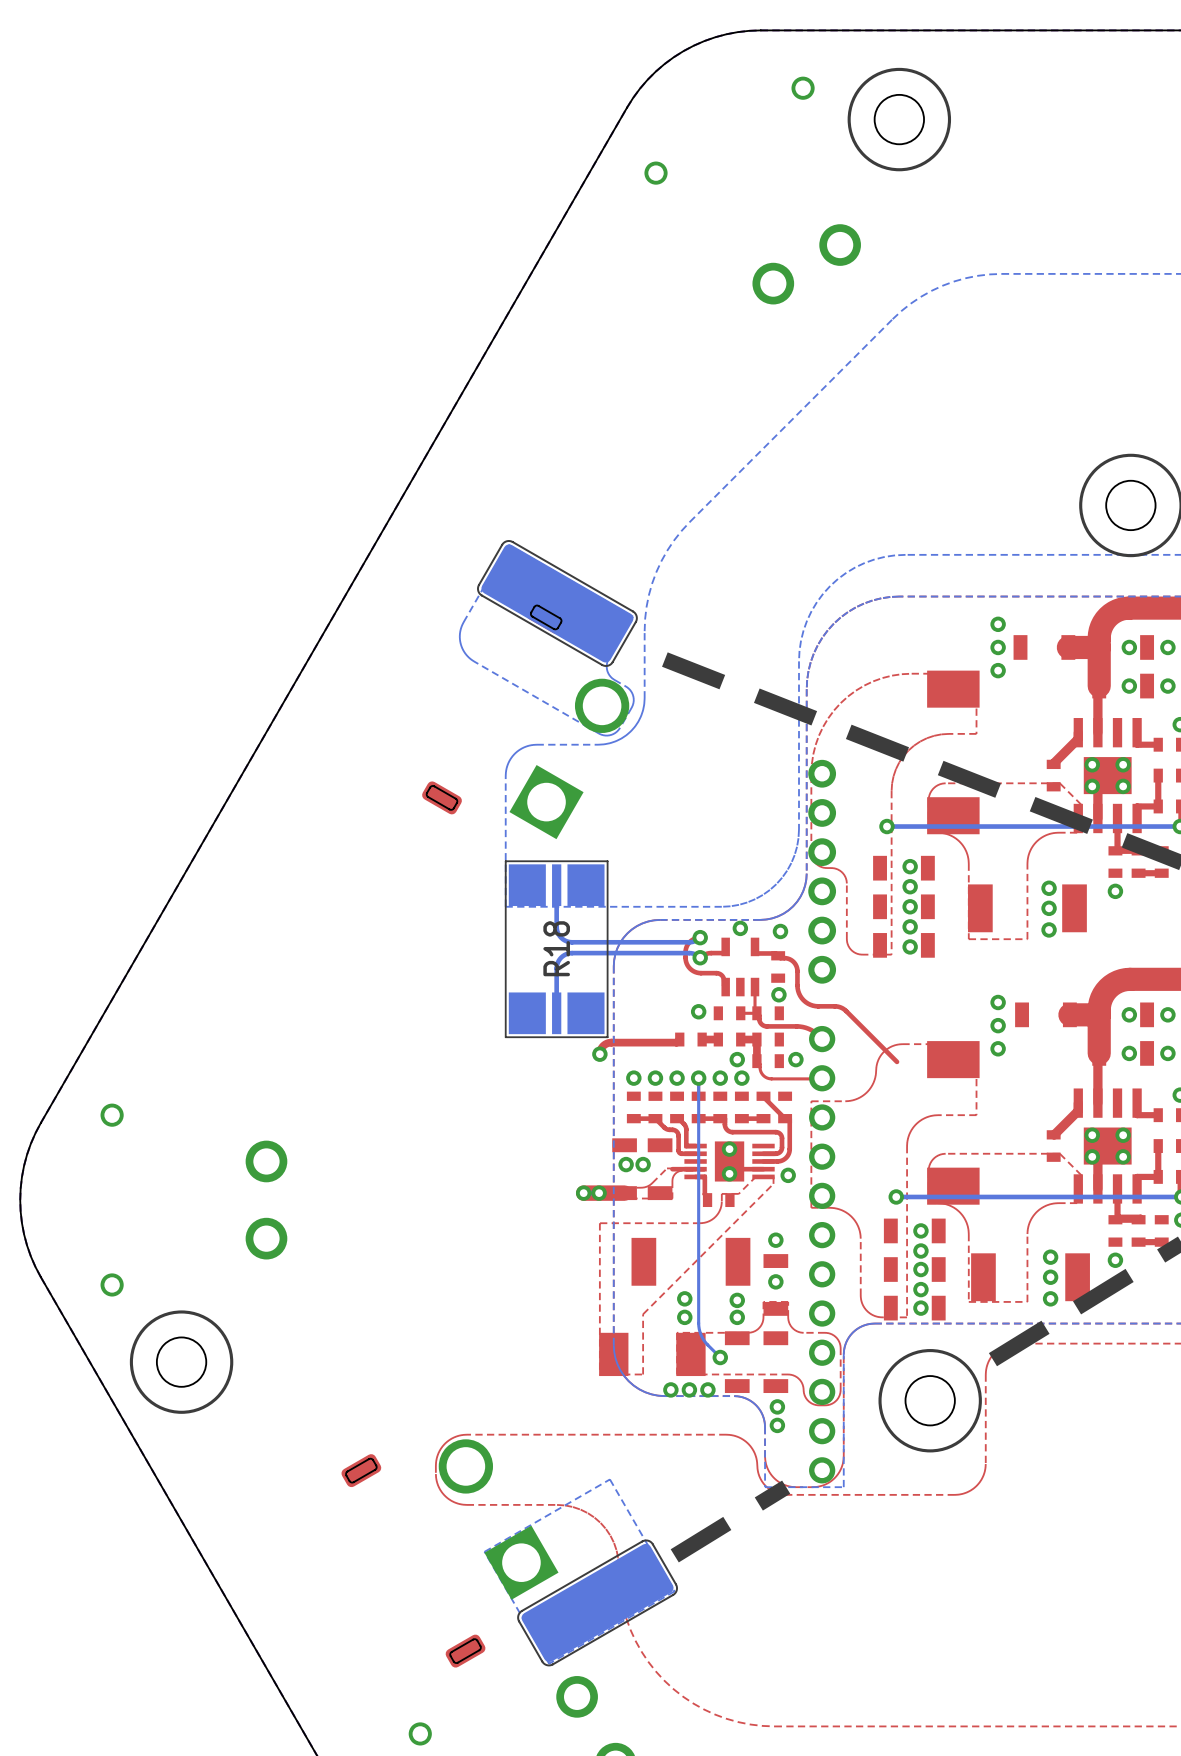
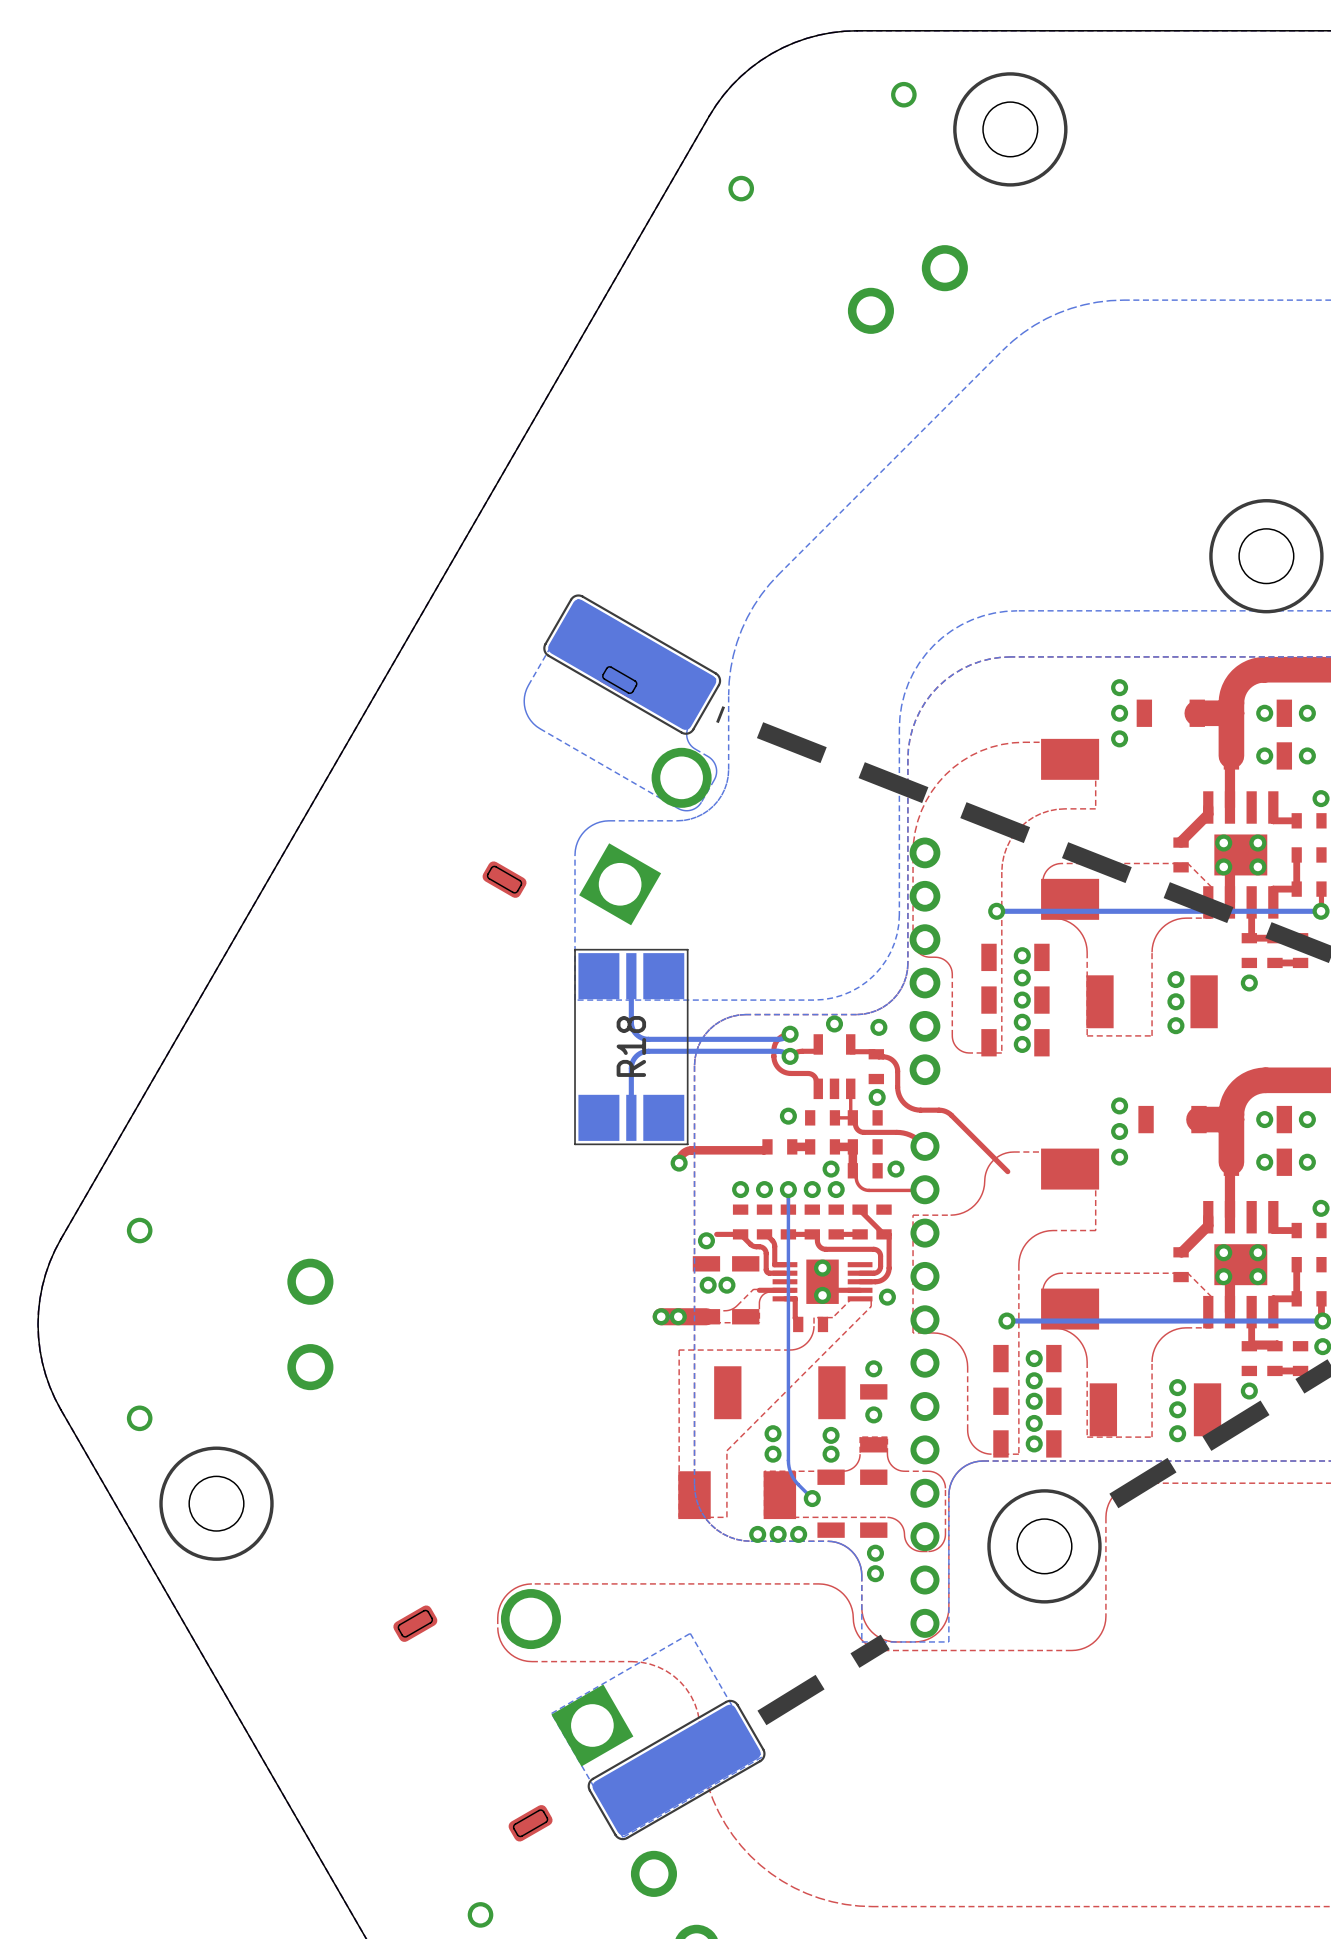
via position: (633, 1078) -> (706, 1240)
part: (633, 1107) -> none

